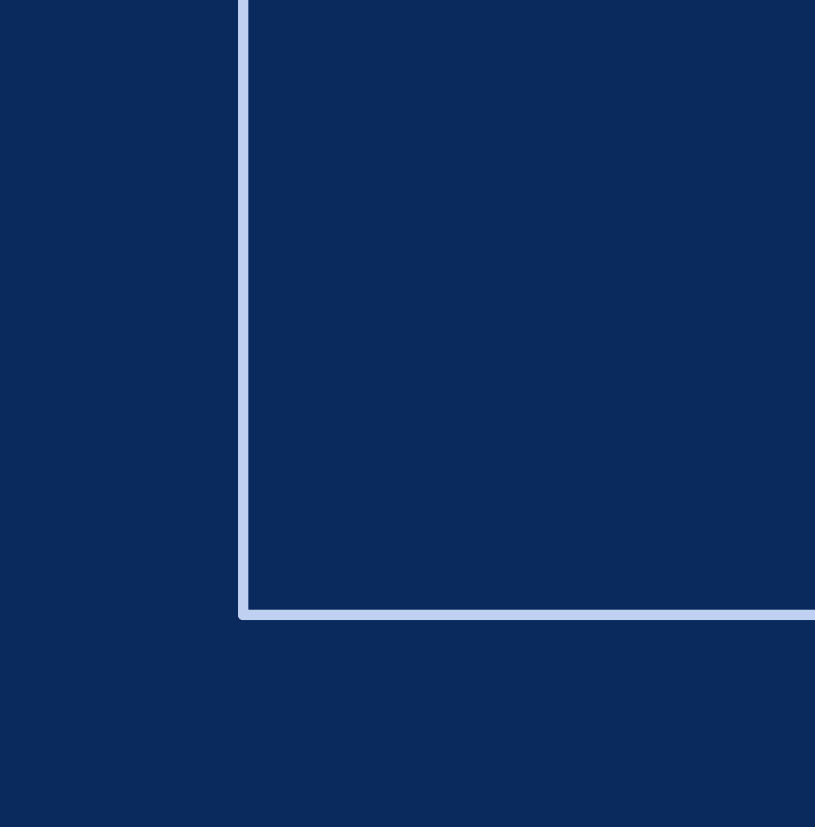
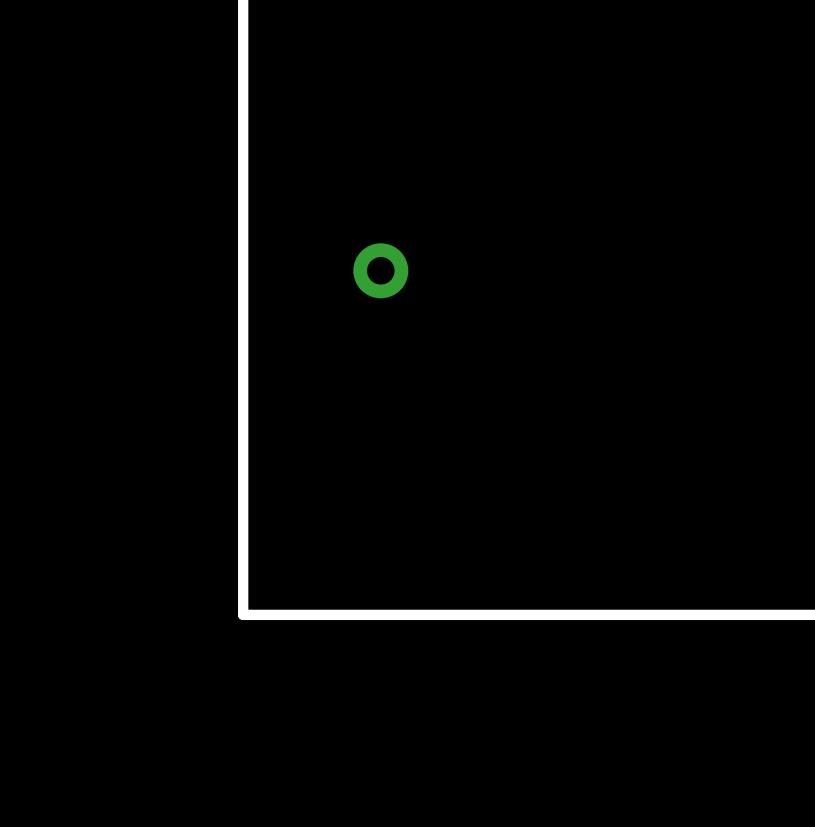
via: none -> (380, 270)

